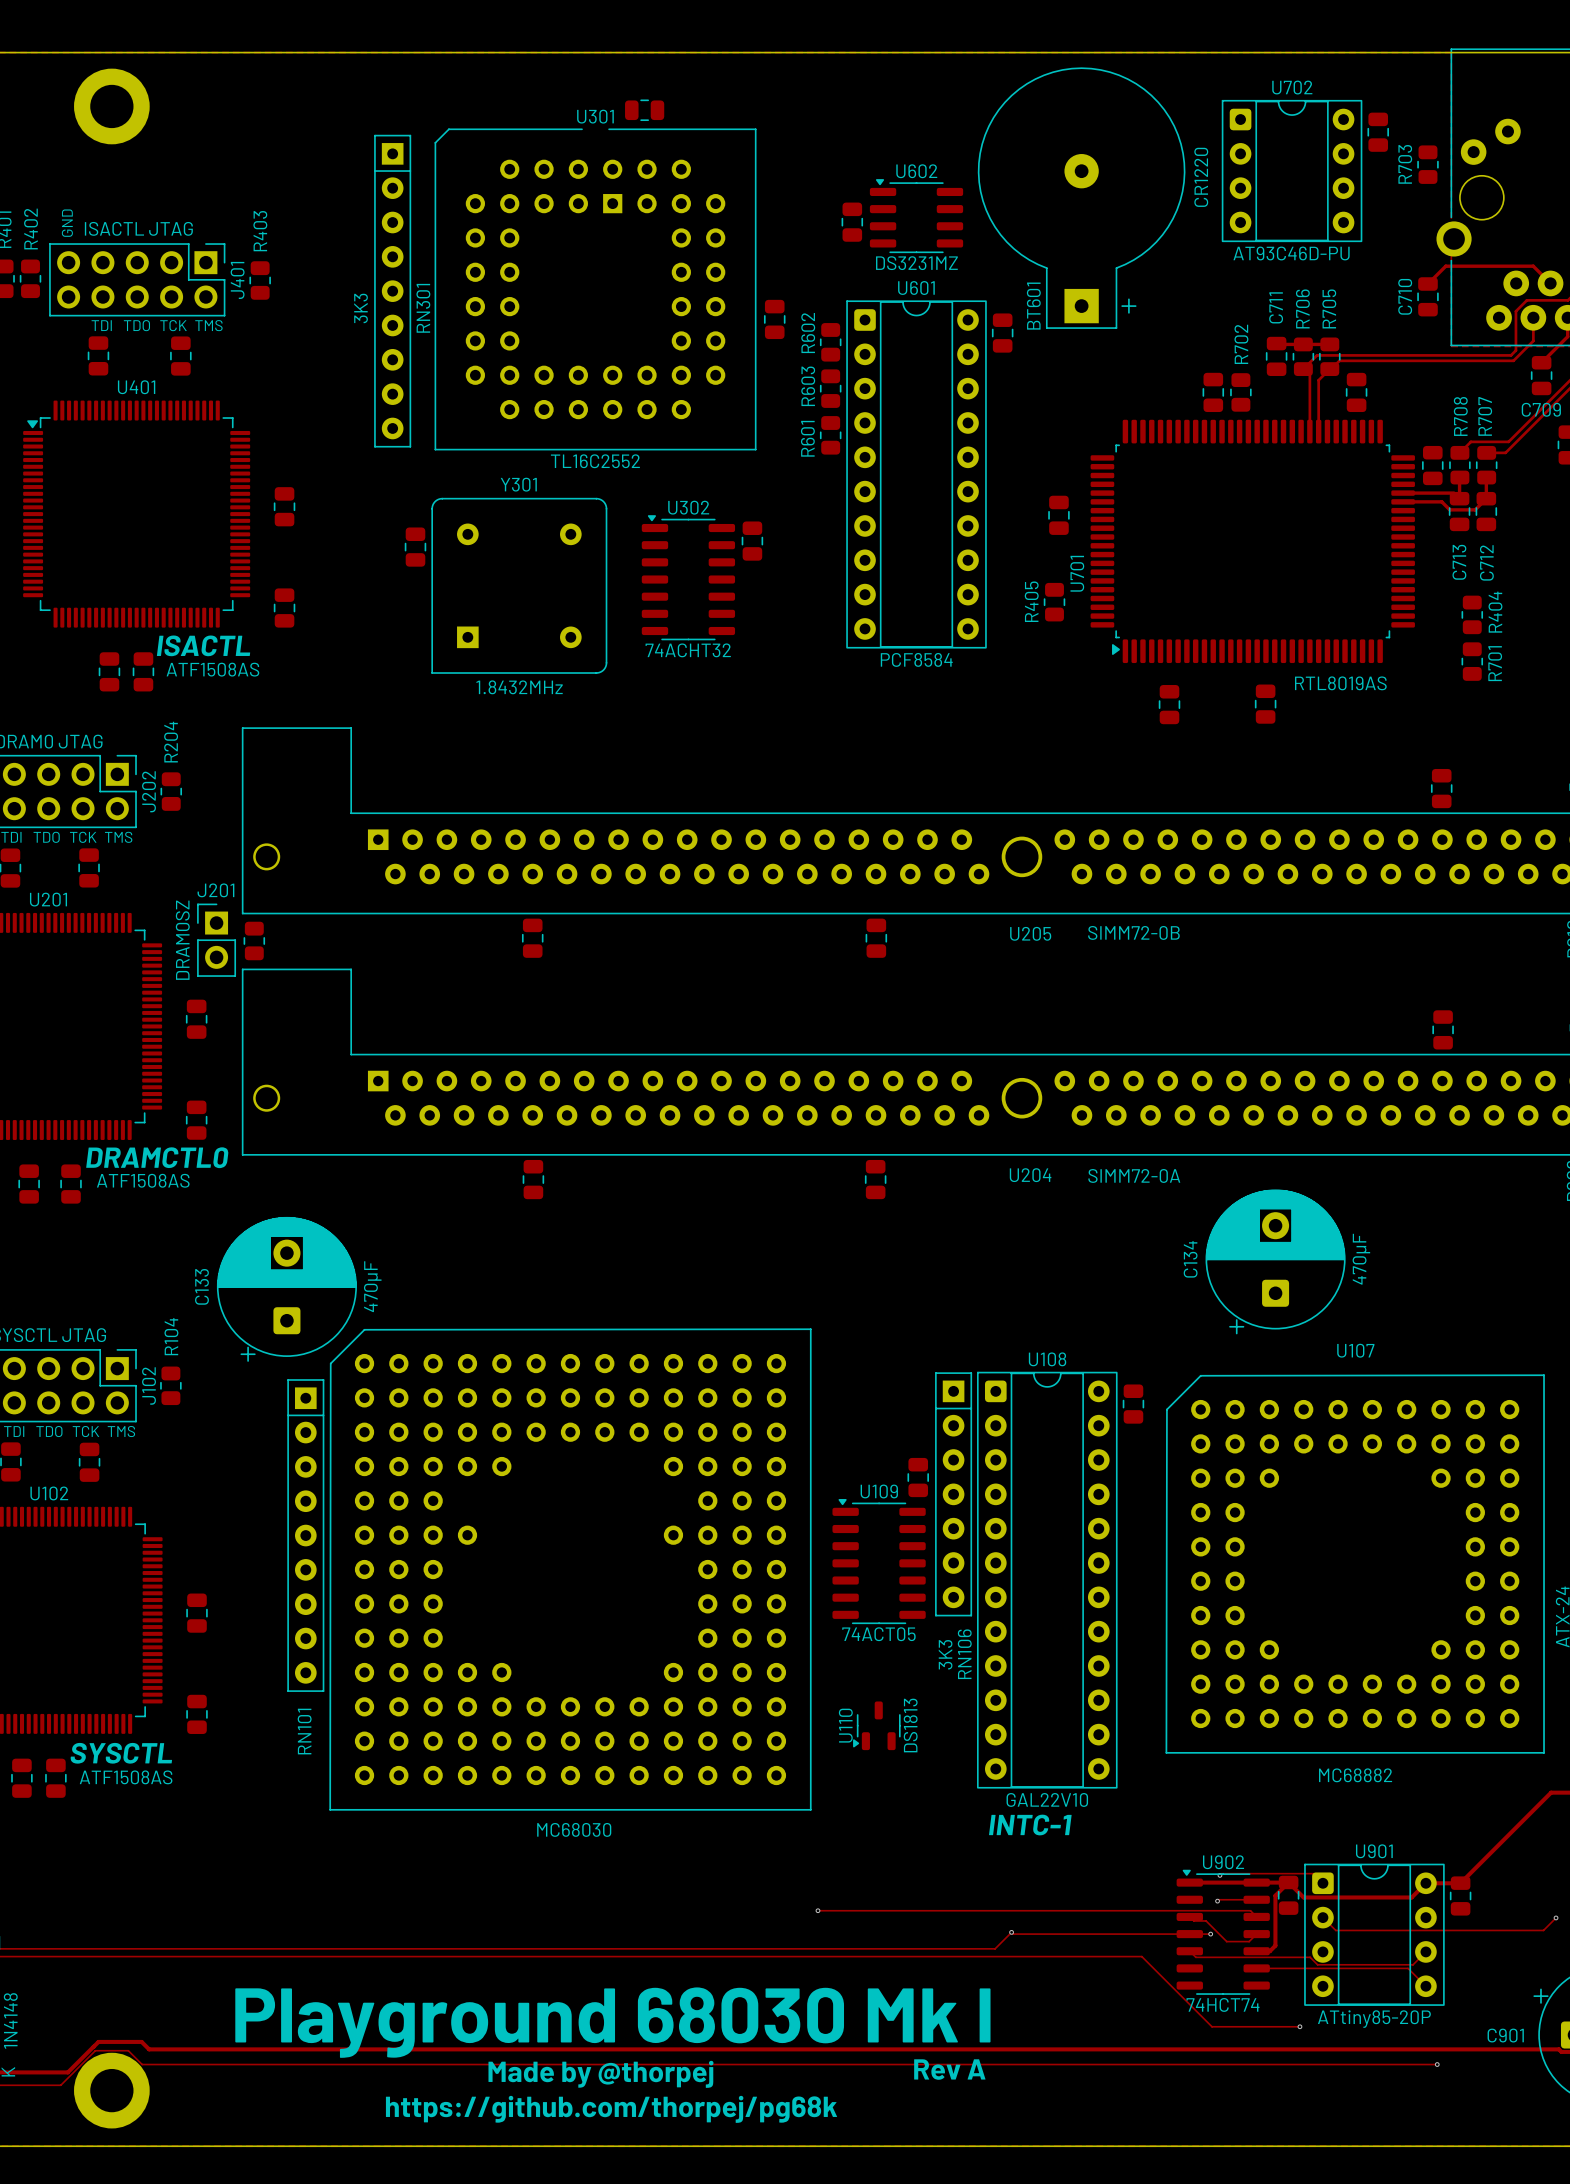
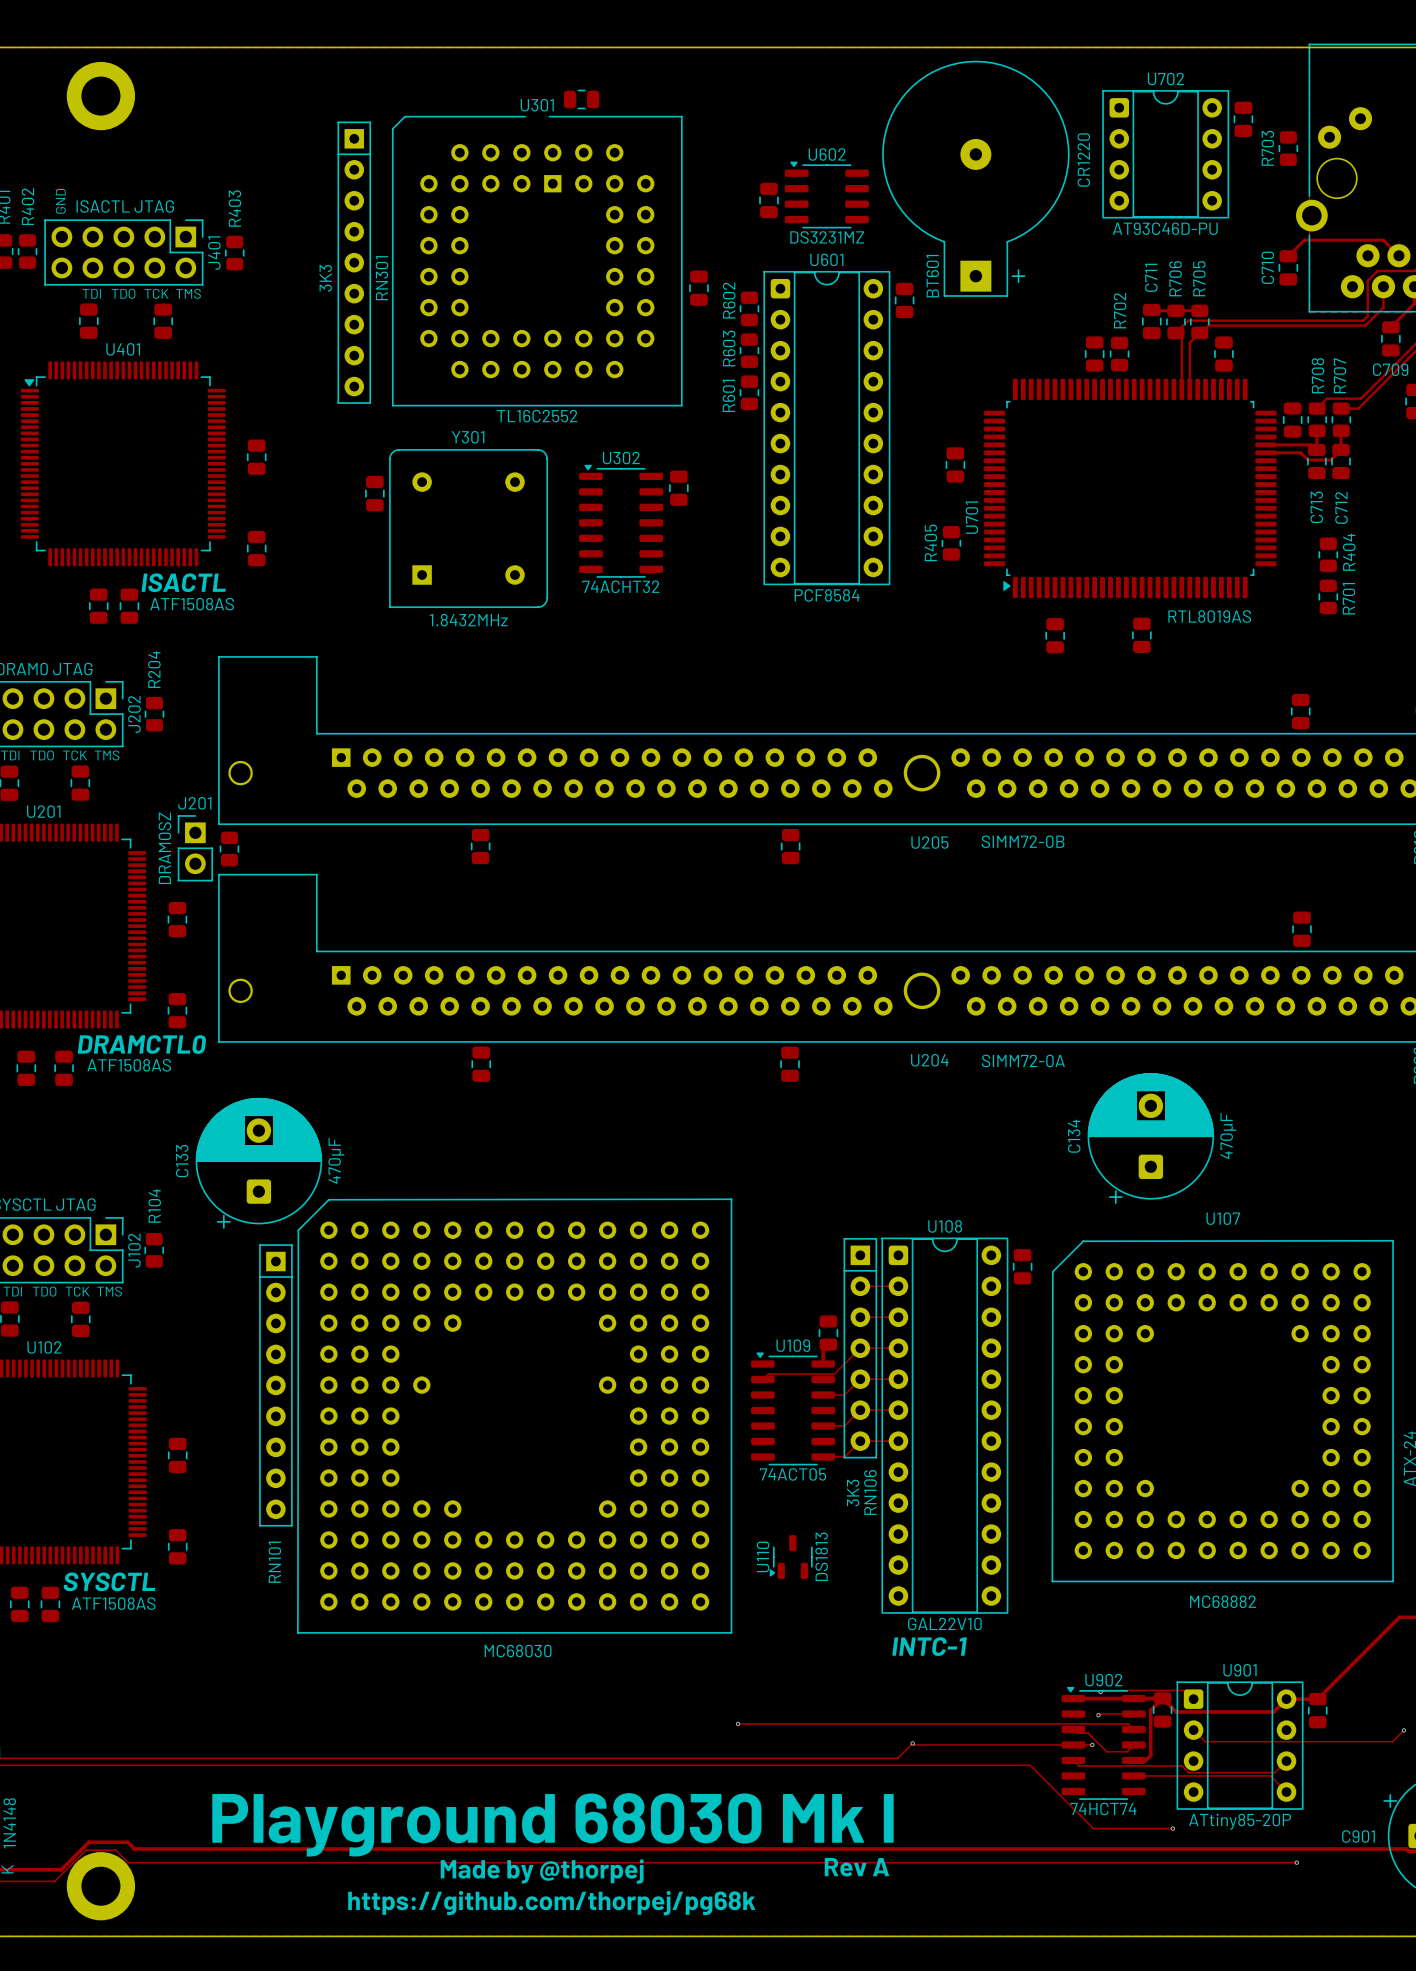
track: none -> (860, 1286) (898, 1286)
track: none -> (860, 1317) (898, 1317)
track: none -> (828, 1344) (823, 1349) (823, 1364)
track: none -> (898, 1348) (860, 1348) (834, 1374) (768, 1374) (762, 1379)
track: none -> (898, 1379) (860, 1379) (844, 1395) (823, 1395)
track: none -> (898, 1410) (860, 1410) (844, 1425) (823, 1425)
track: none -> (898, 1441) (860, 1441) (844, 1456) (823, 1456)

